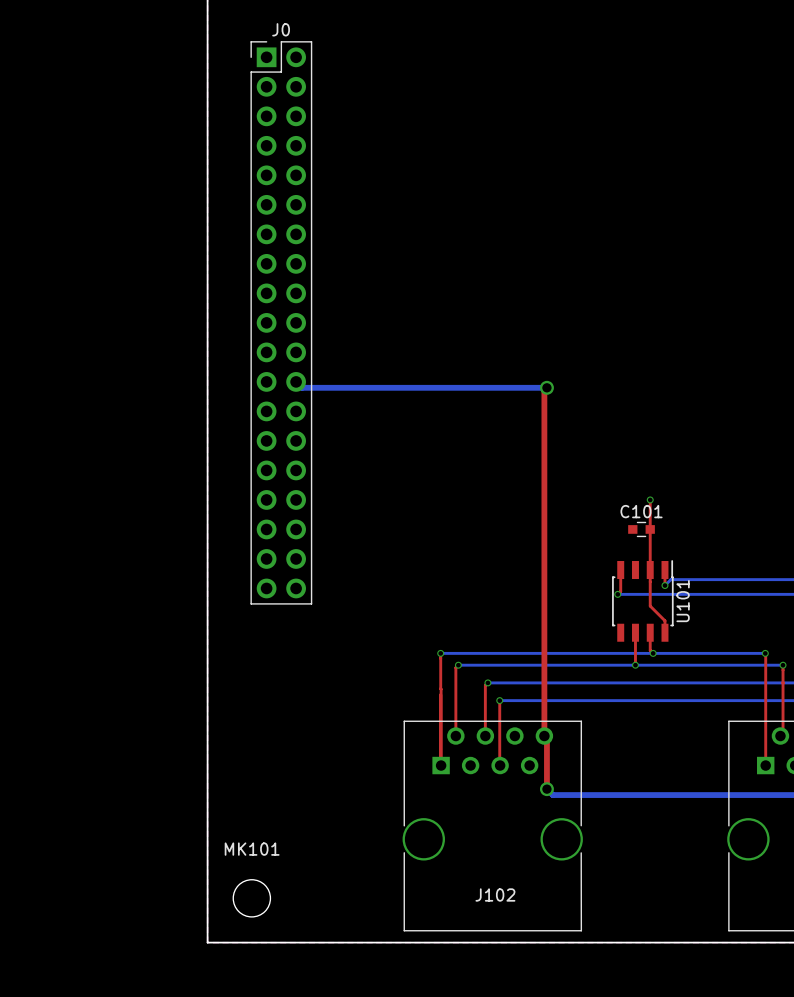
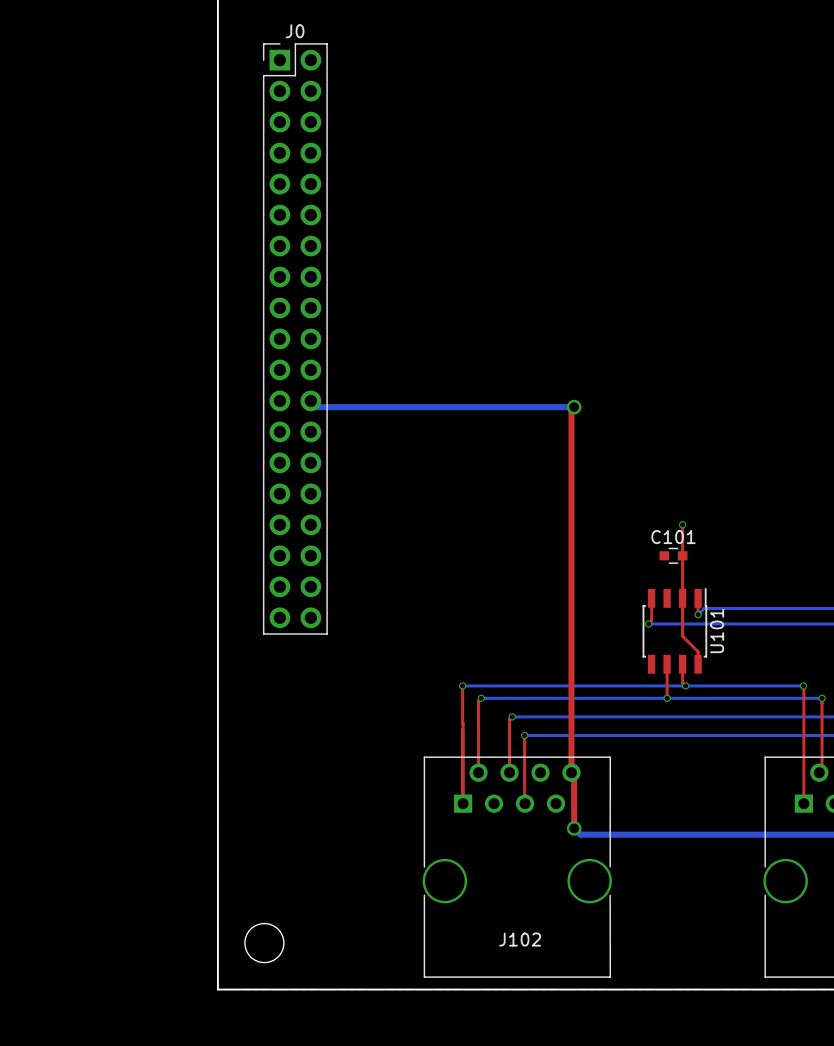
MK101 name: MK101 (252, 849) -> none

